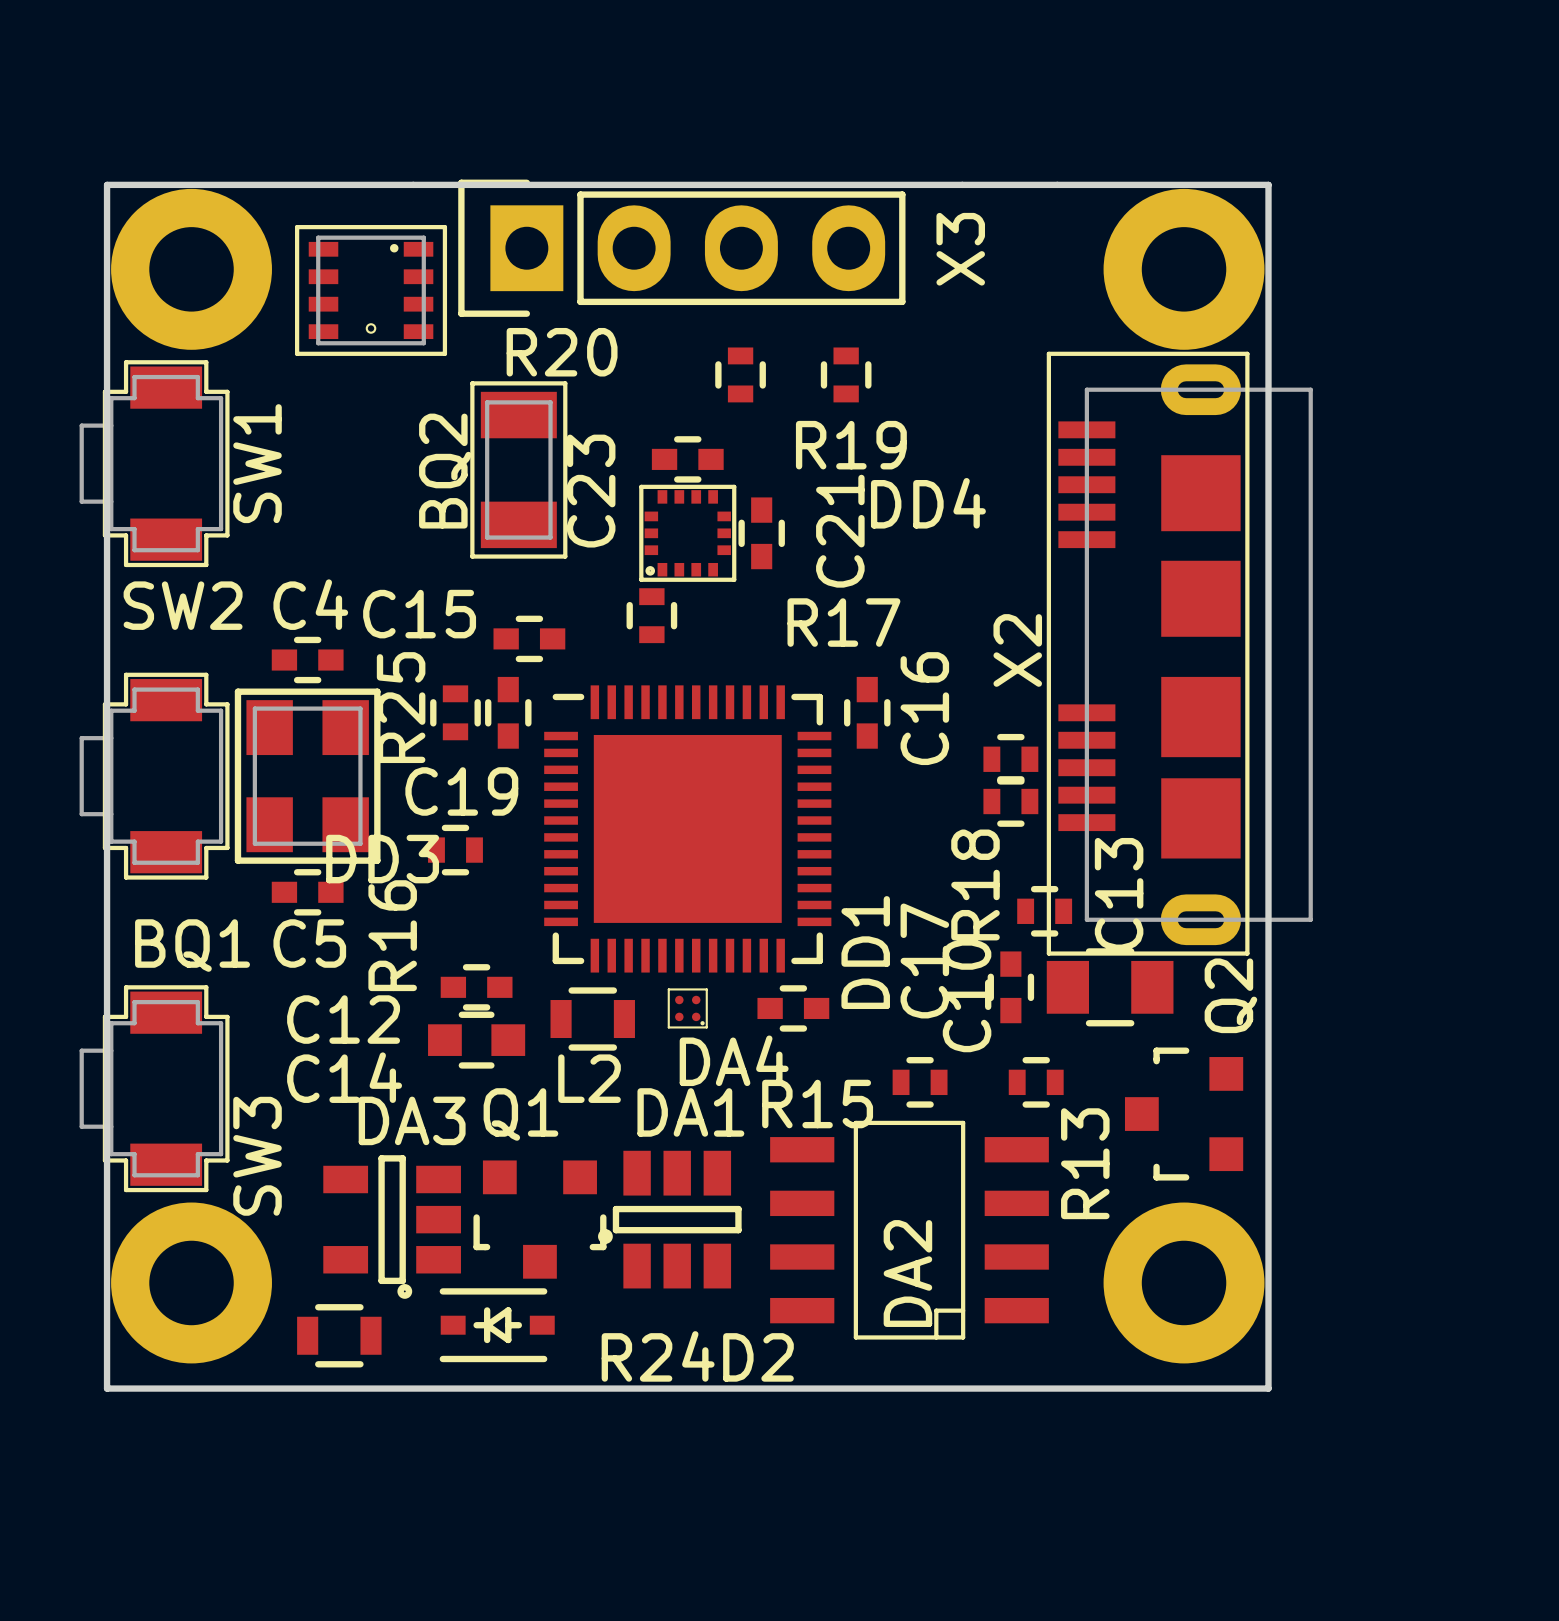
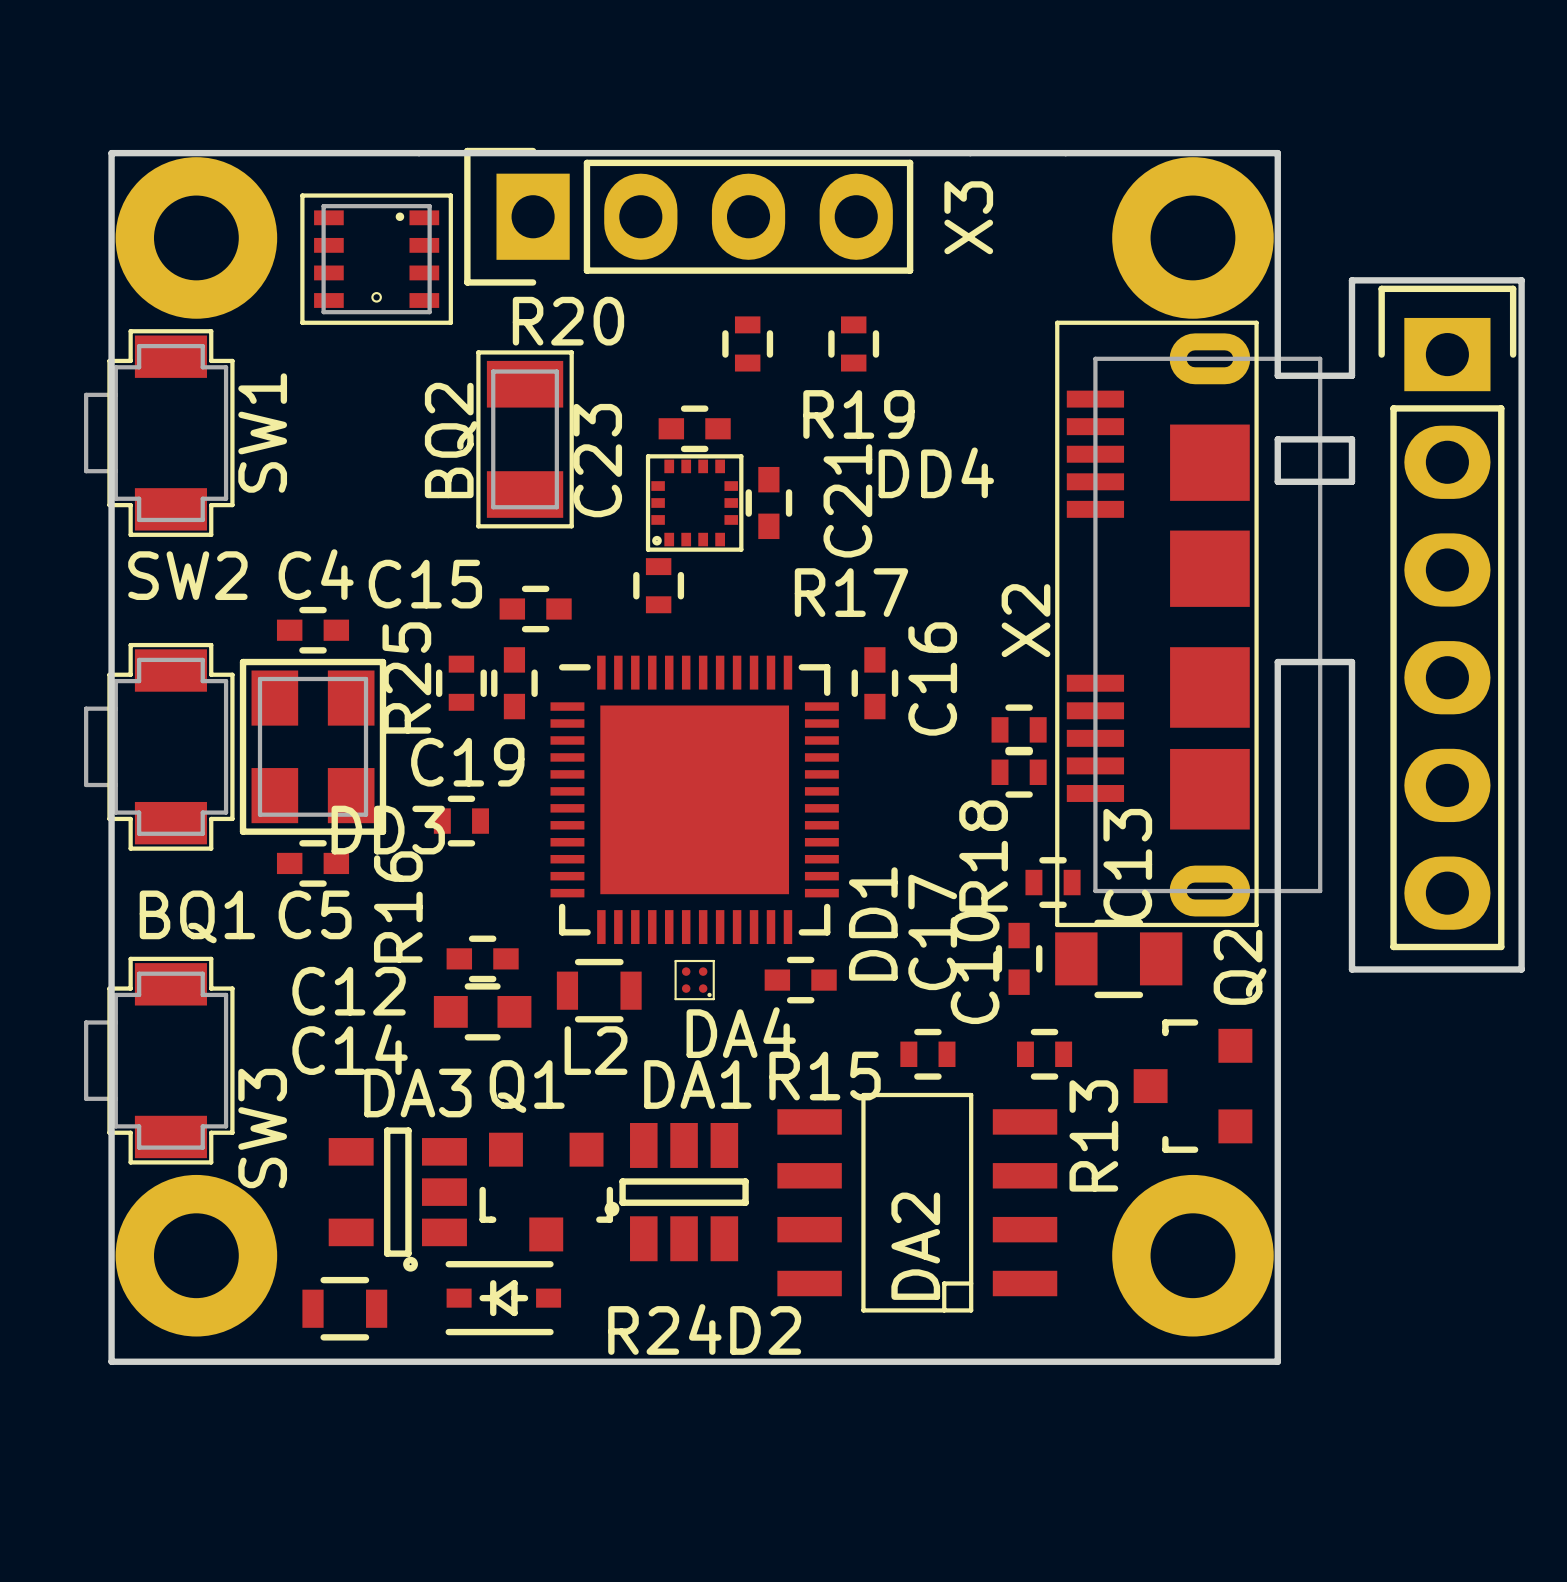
board edge: (1268, 406) (1268, 469) -> (1277, 481) (1351, 481) (1351, 439) (1277, 439)
board edge: (1268, 512) (1268, 691) -> (1277, 375) (1351, 375) (1351, 280) (1521, 280) (1521, 969) (1351, 969) (1351, 662) (1277, 662)
part: none -> (1447, 617)

